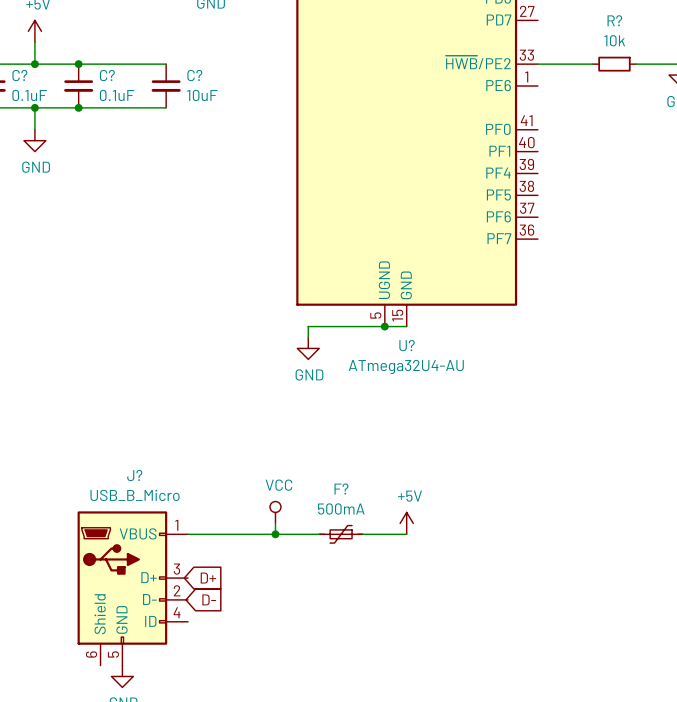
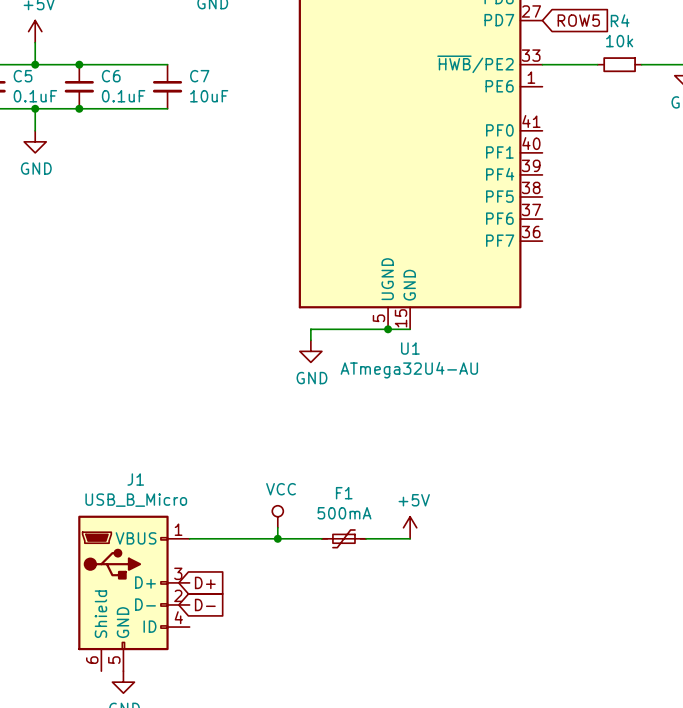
global label: none -> ROW5 (578, 20)
R? name: R? (614, 20) -> R4 (620, 20)
C? name: C? (19, 75) -> C5 (23, 76)
C? name: C? (107, 75) -> C6 (111, 76)
C? name: C? (194, 75) -> C7 (199, 76)
U? name: U? (407, 345) -> U1 (410, 348)
J? name: J? (134, 475) -> J1 (135, 479)
F? name: F? (341, 489) -> F1 (344, 493)

